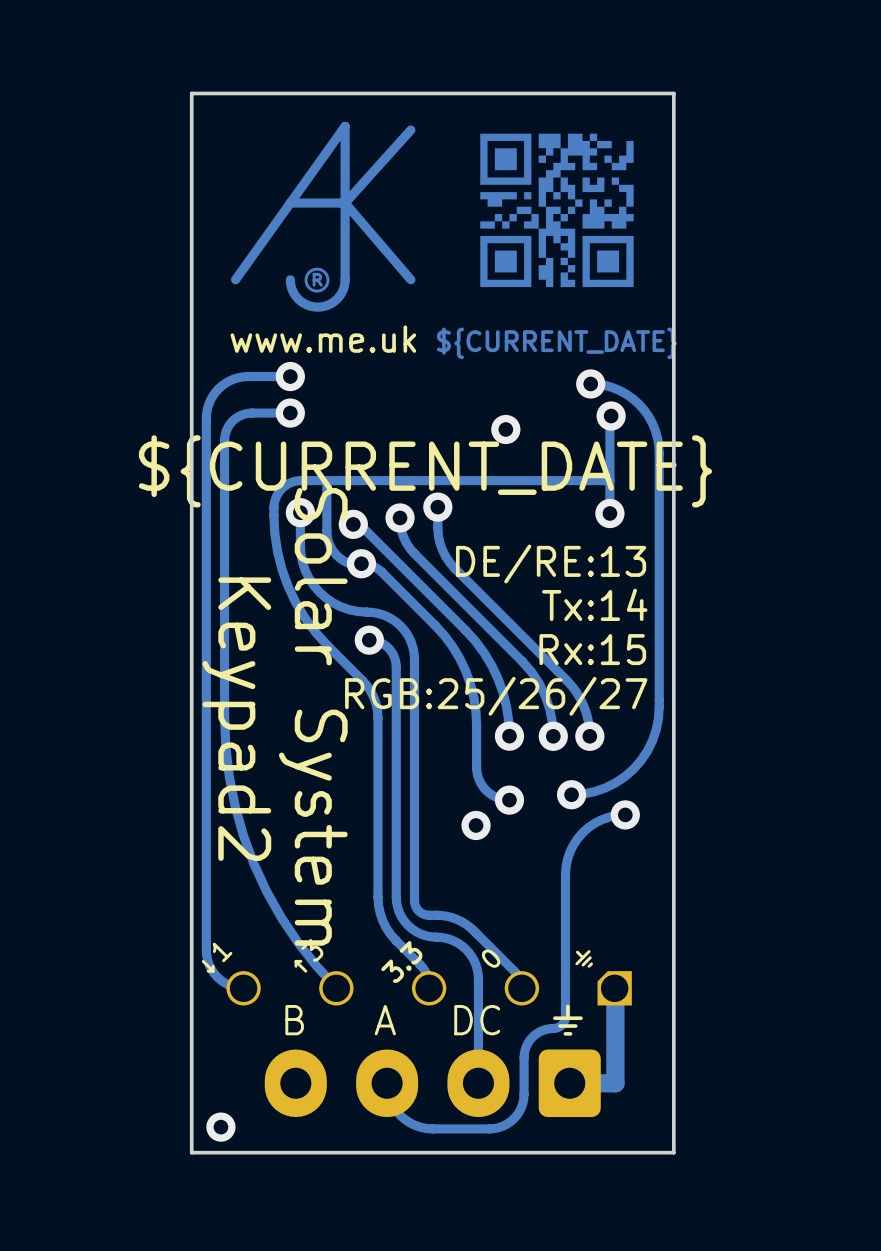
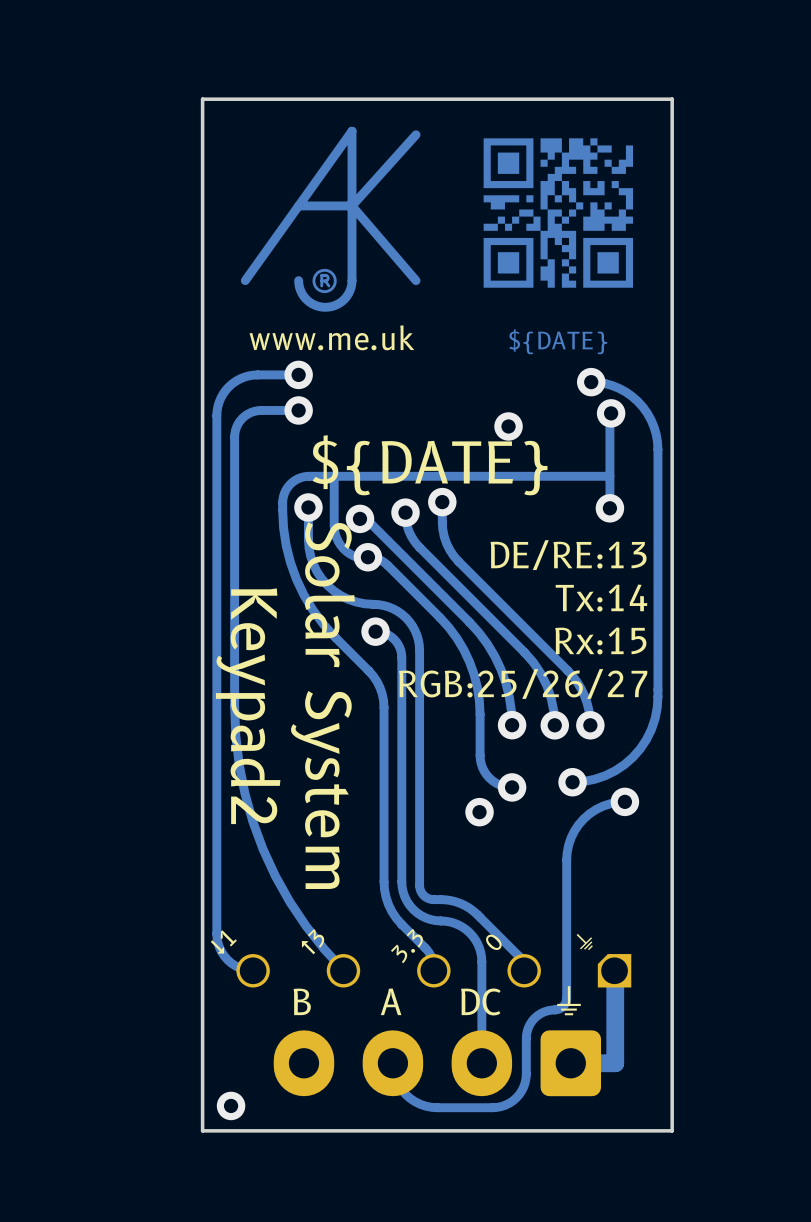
part text: ${CURRENT_DATE} (556, 343) -> ${DATE} (558, 341)
text: ${CURRENT_DATE} (425, 471) -> ${DATE} (429, 465)

